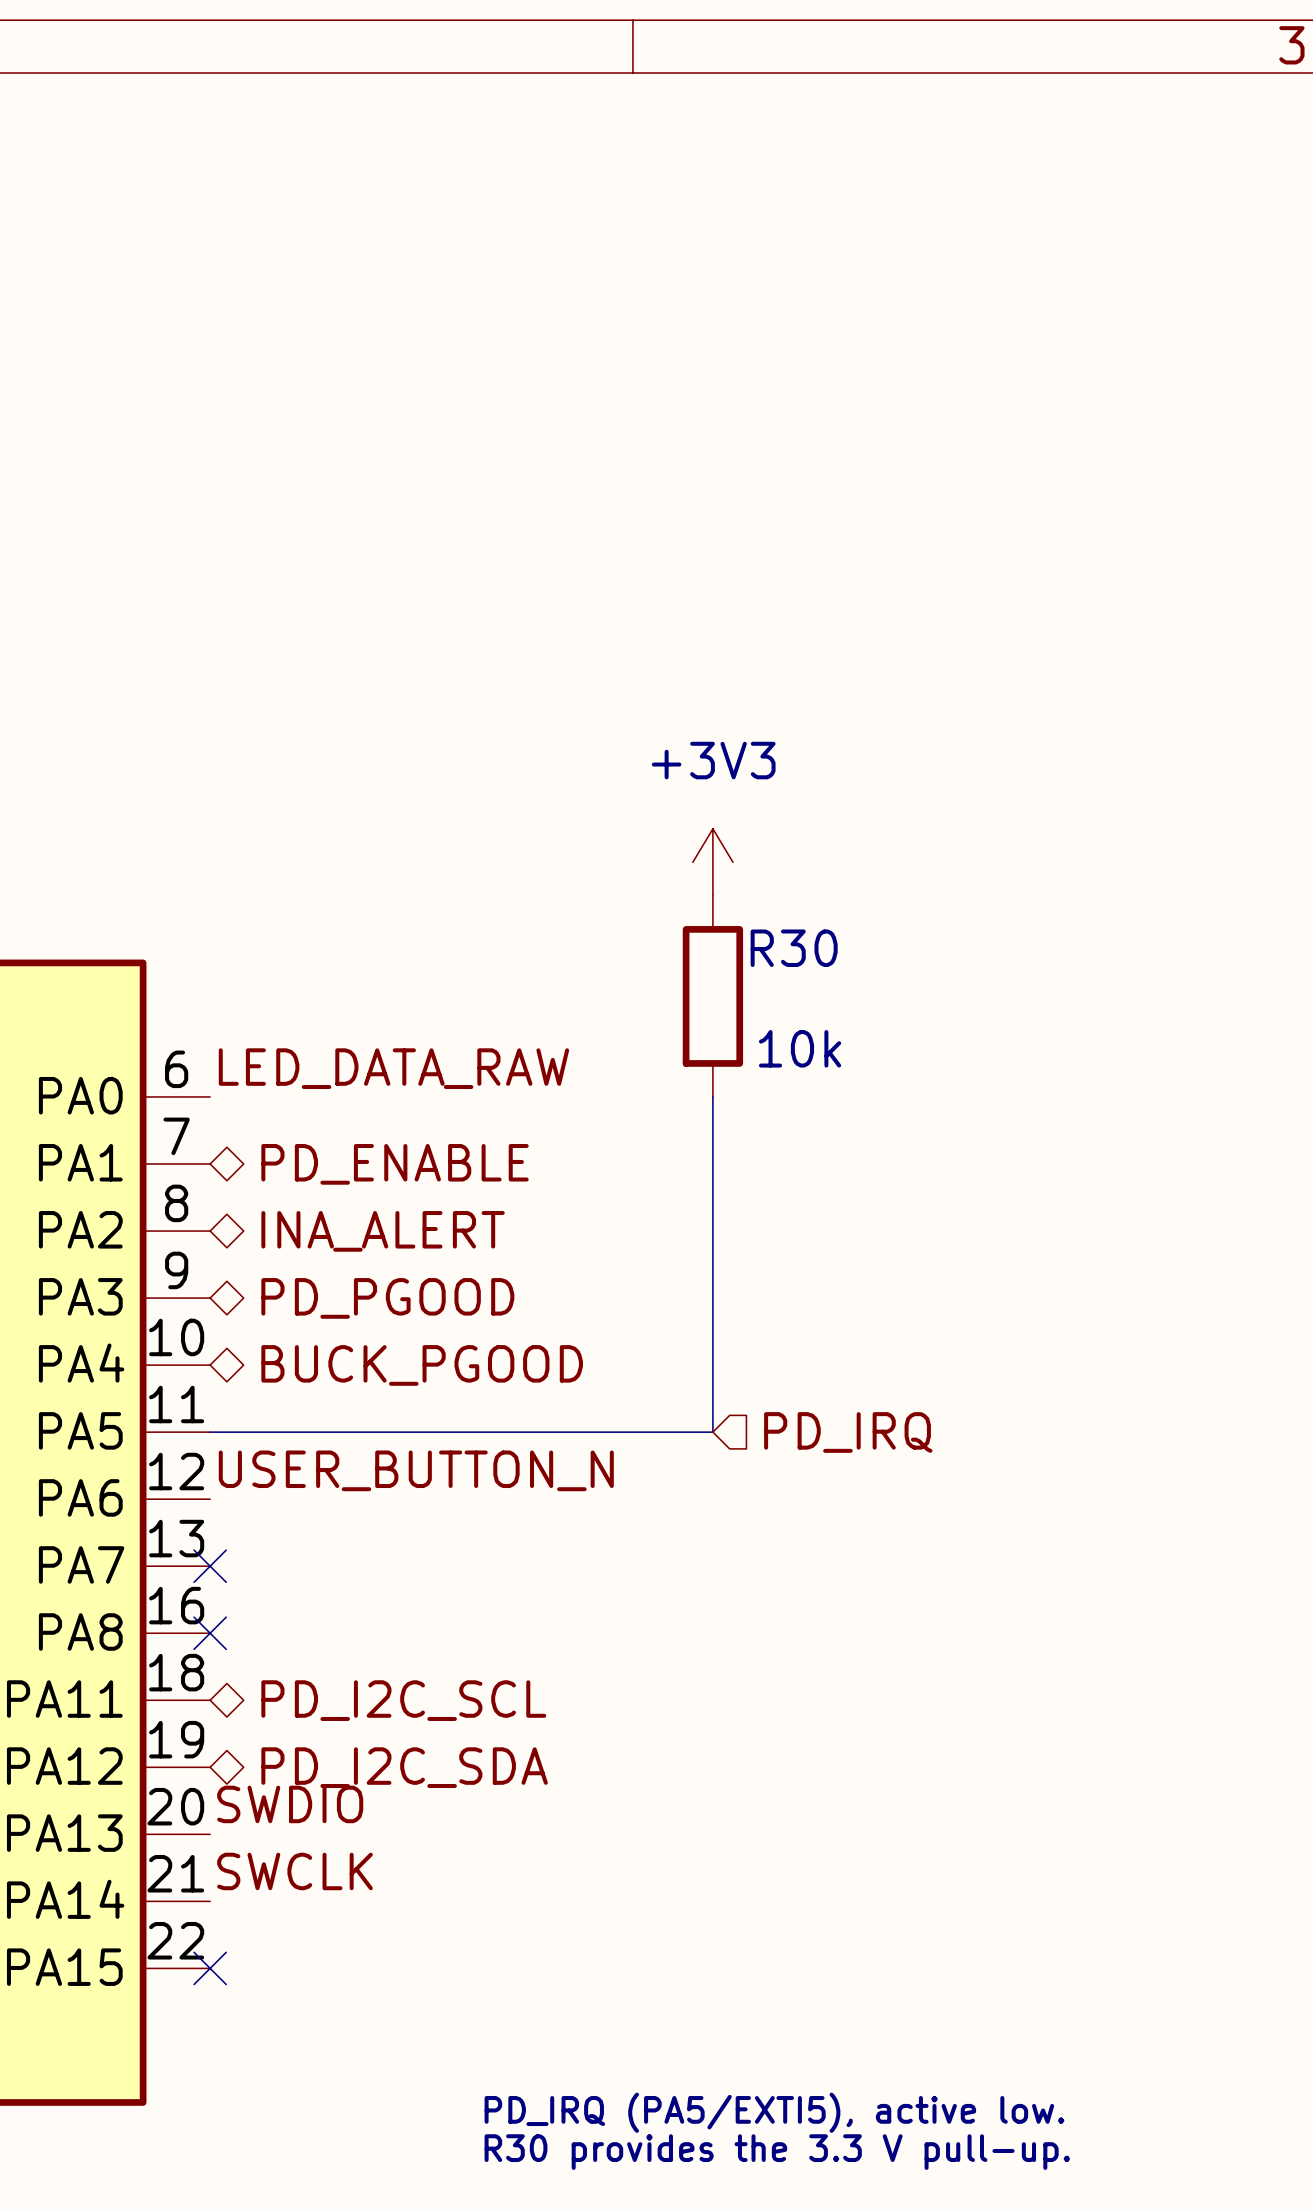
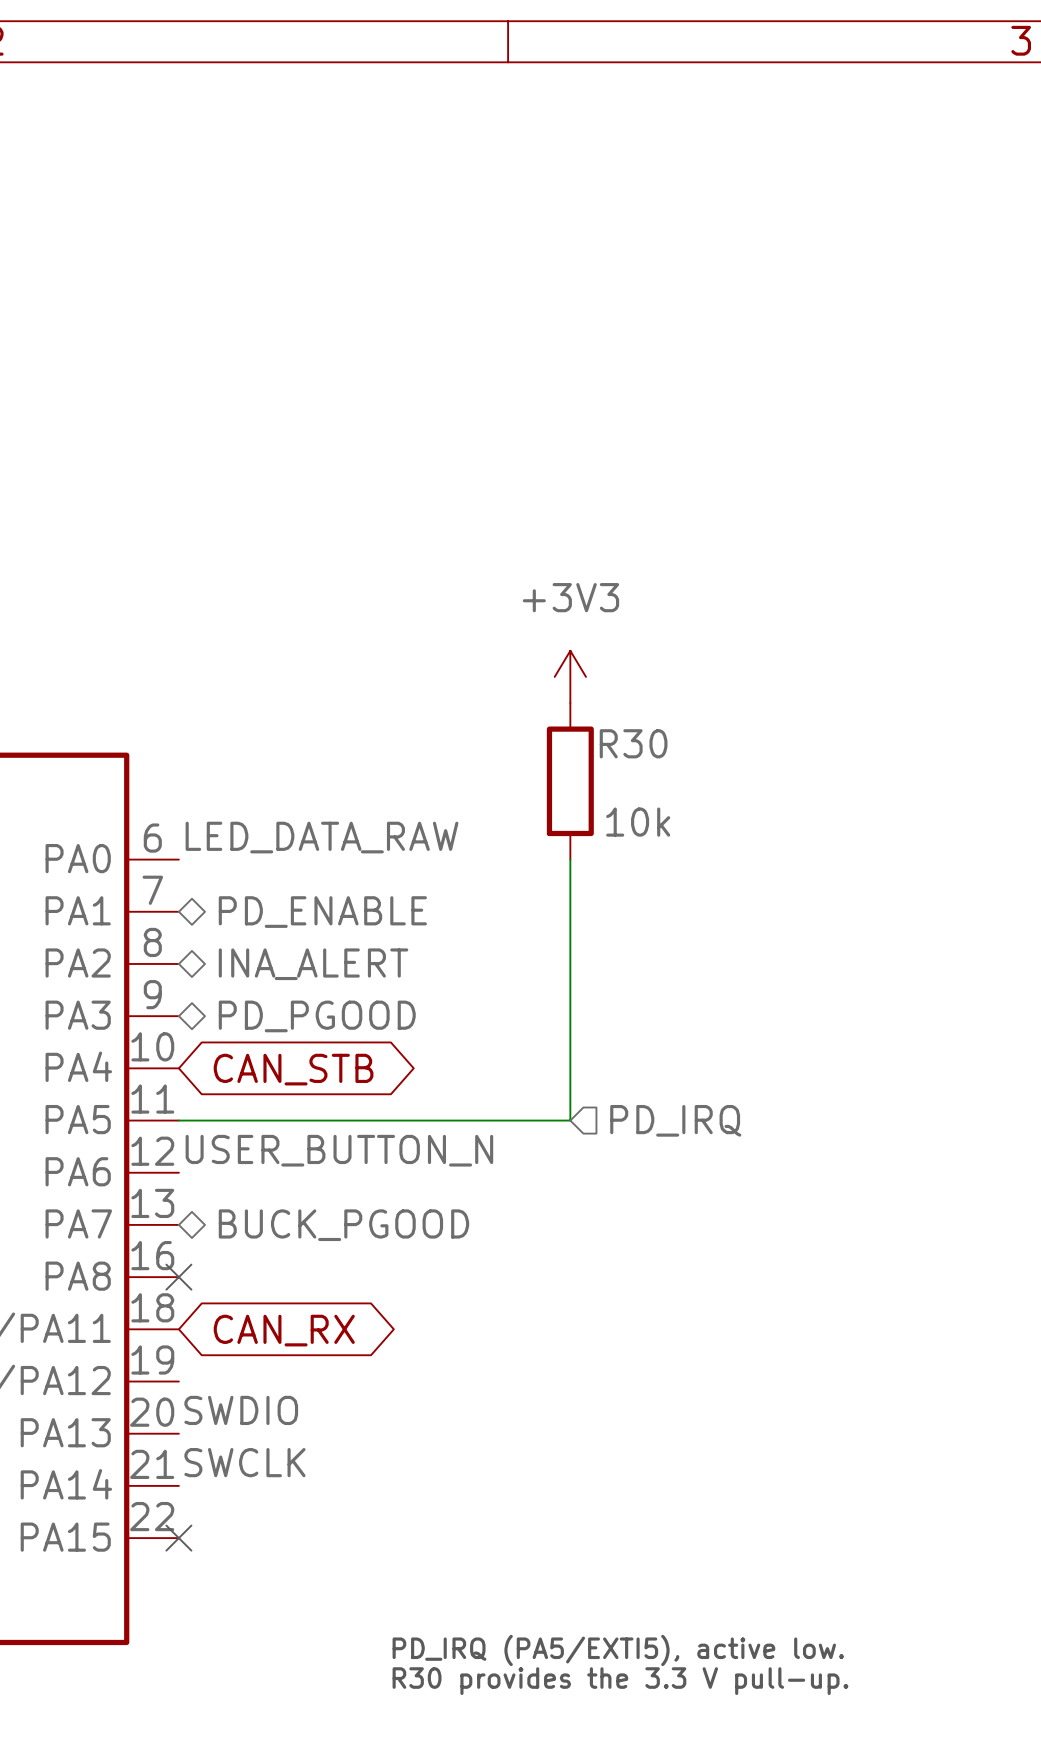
hierarchical label position: BUCK_PGOOD (422, 1365) -> BUCK_PGOOD (343, 1225)
global label: none -> CAN_STB (293, 1069)
no-connect mark: (210, 1566) -> none
hierarchical label: PD_I2C_SCL (403, 1700) -> none
global label: none -> CAN_RX (284, 1330)
hierarchical label: PD_I2C_SDA (404, 1767) -> none

